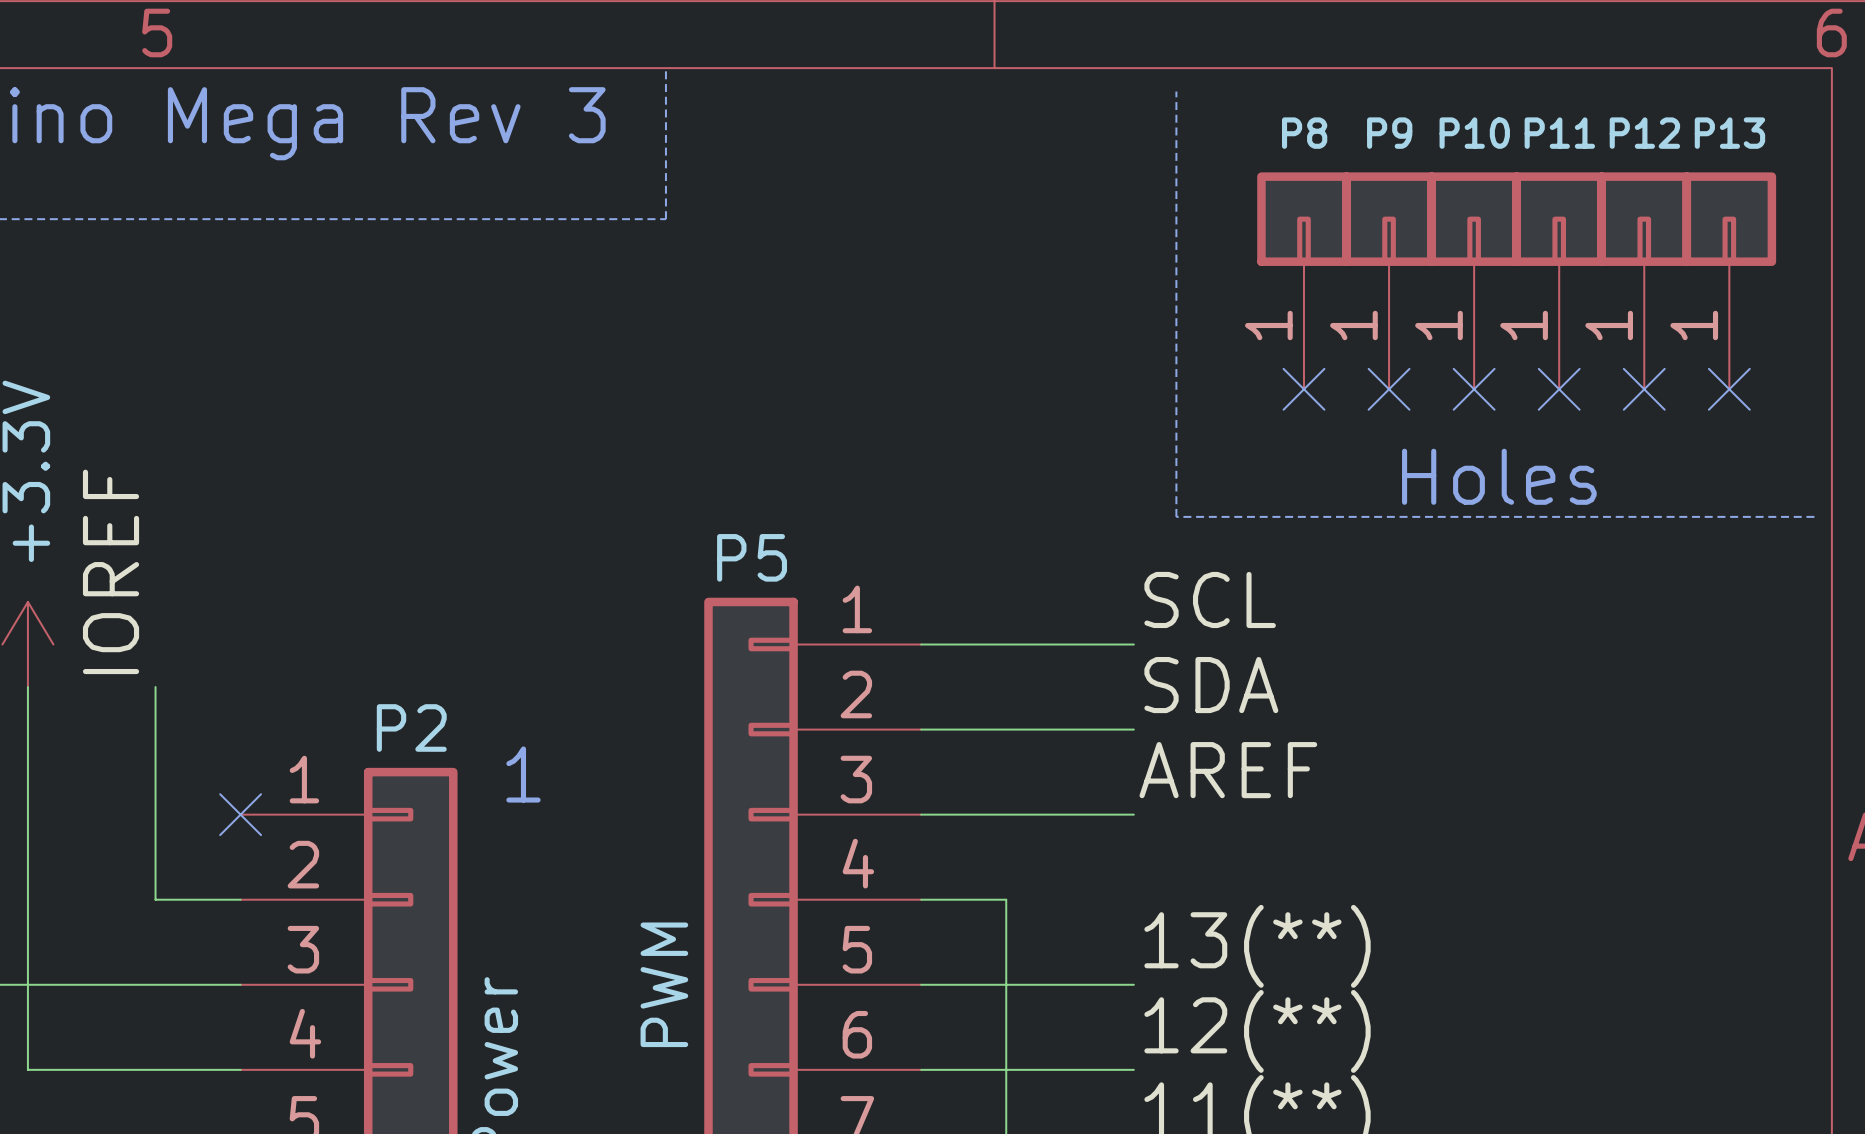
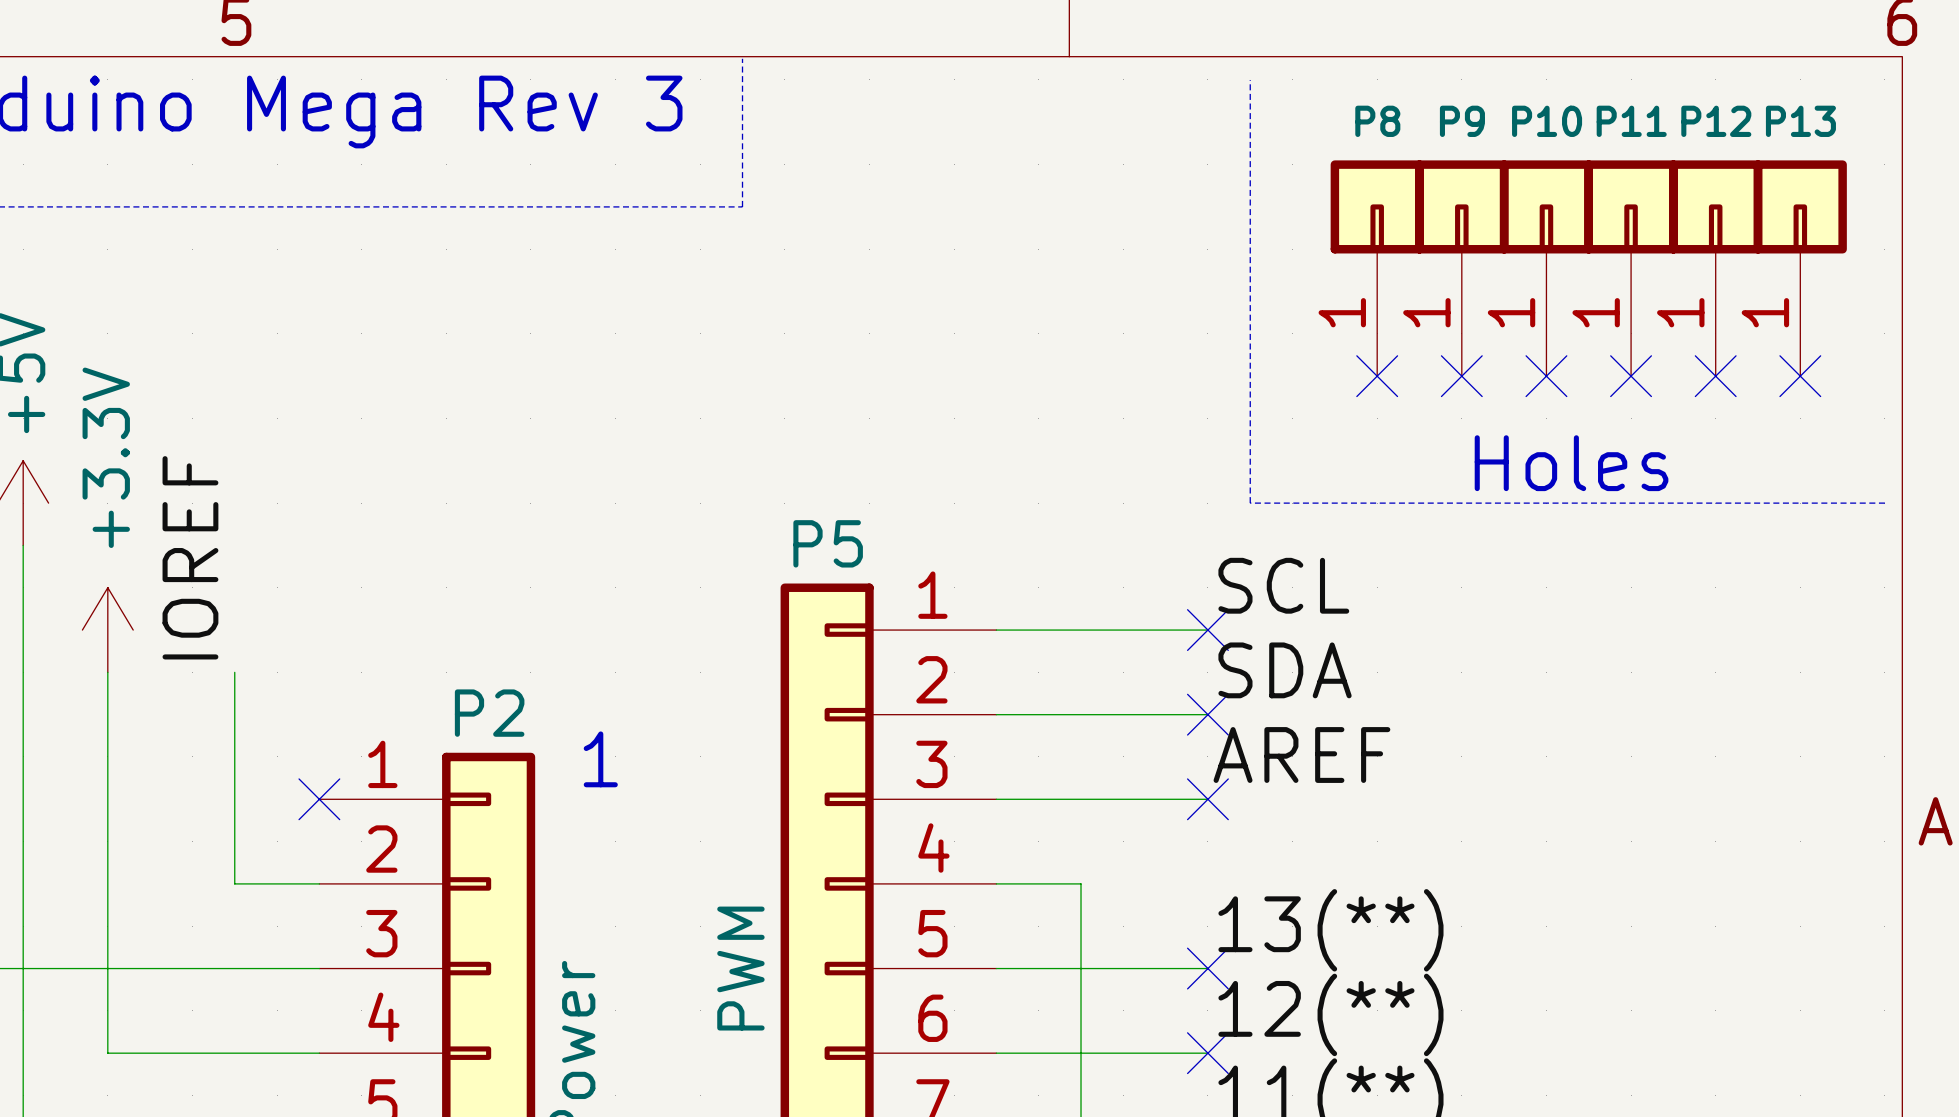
no-connect mark: none -> (1207, 630)
no-connect mark: none -> (1207, 714)
no-connect mark: none -> (1207, 799)
no-connect mark: none -> (1207, 968)
no-connect mark: none -> (1207, 1053)

